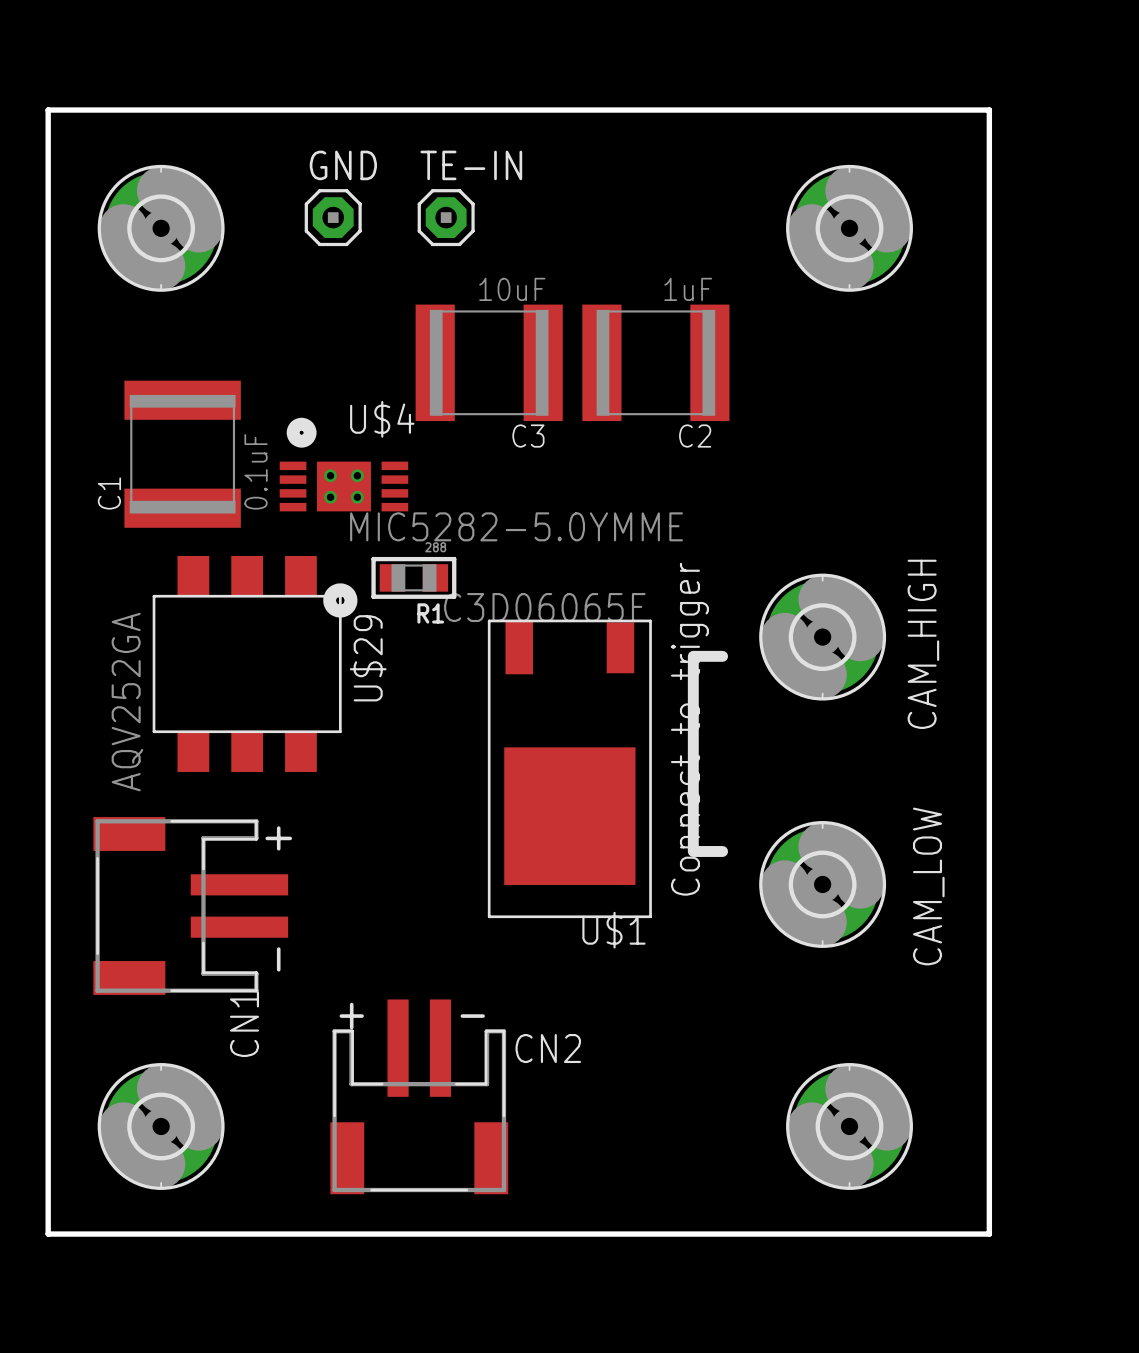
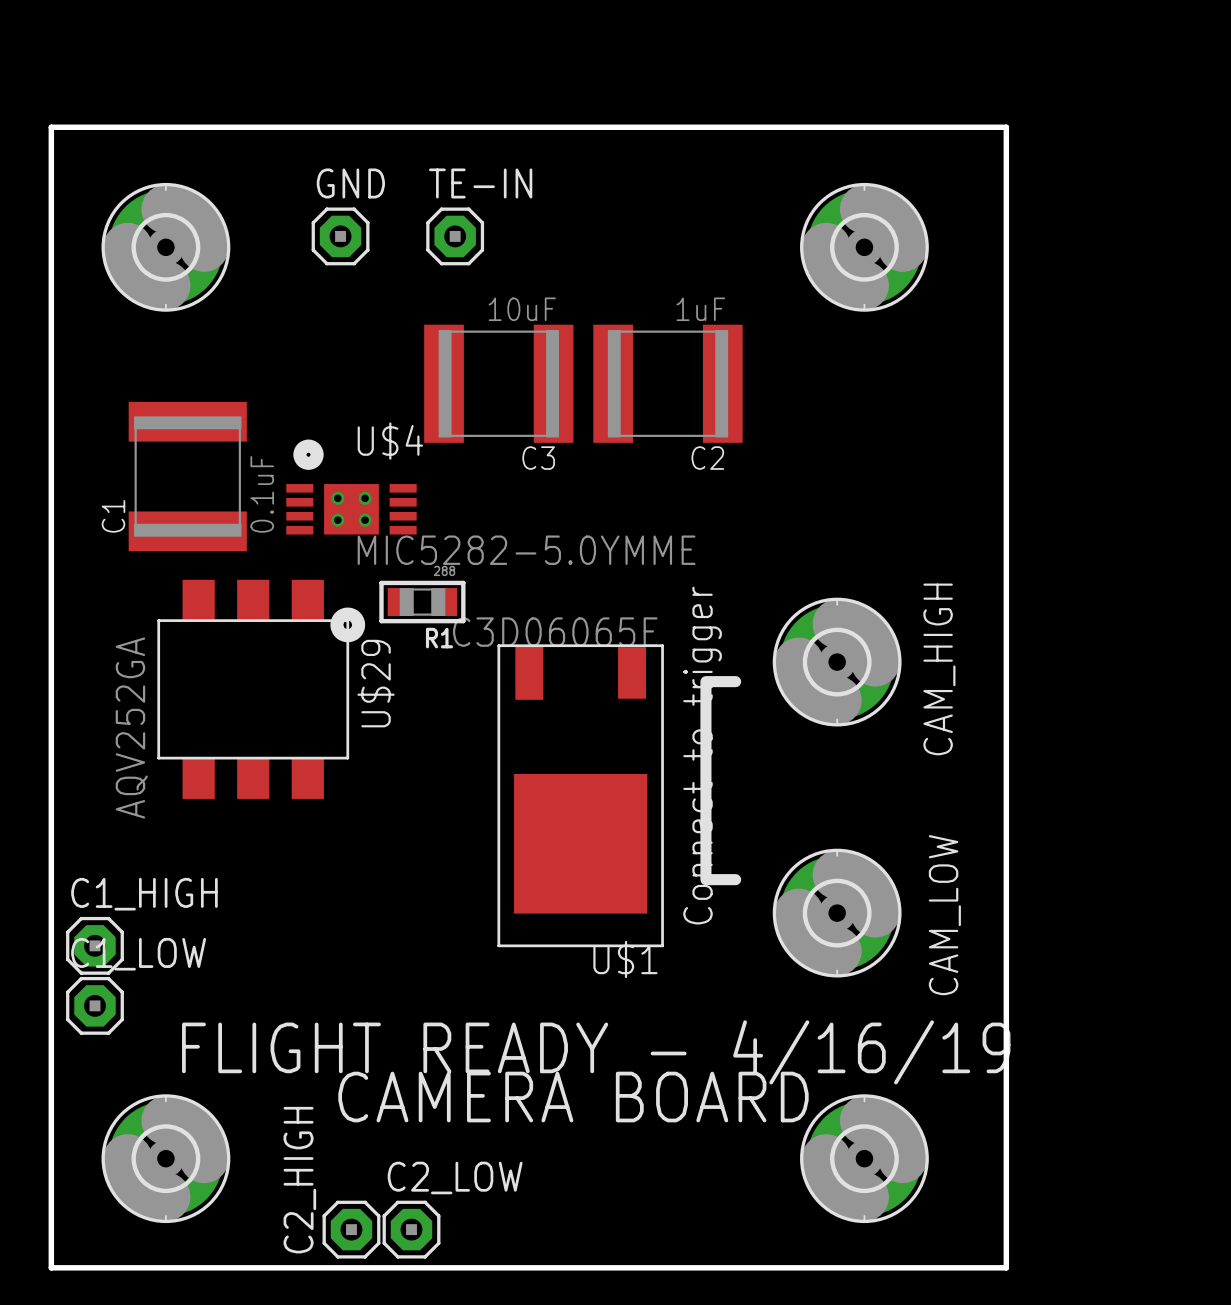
CN1: (190, 905) -> none
C1_HIGH: none -> (94, 945)
C1_LOW: none -> (94, 1005)
text: none -> FLIGHT READY - 4/16/19 (596, 1052)
text: none -> CAMERA BOARD (573, 1097)
CN2: (419, 1096) -> none
C2_HIGH: none -> (351, 1229)
C2_LOW: none -> (411, 1229)

